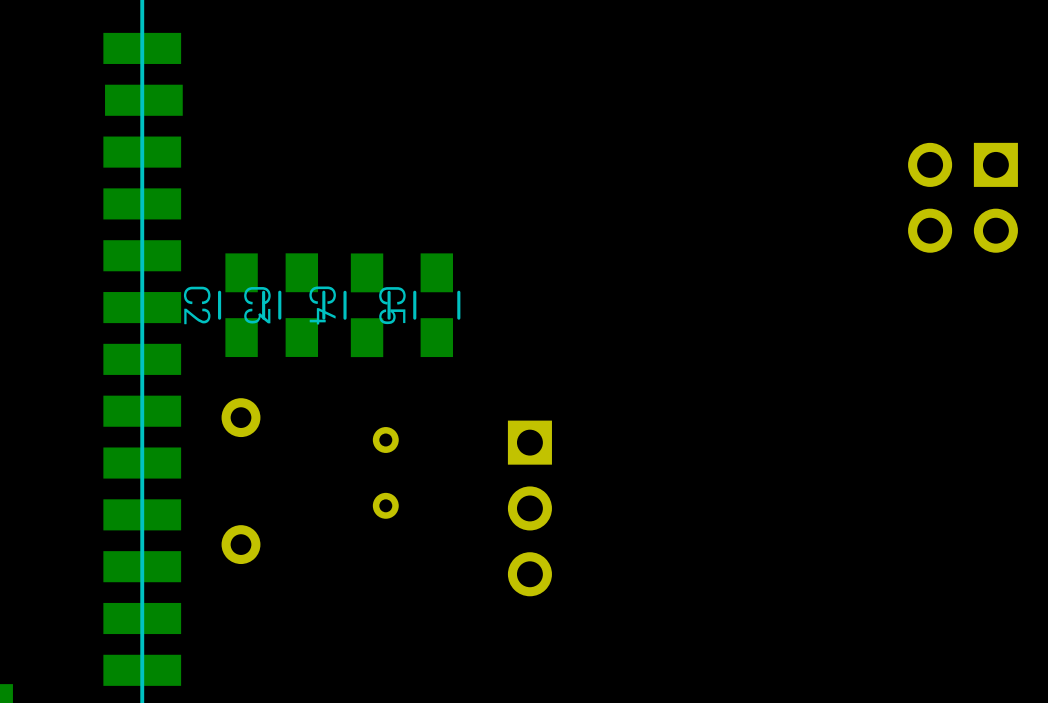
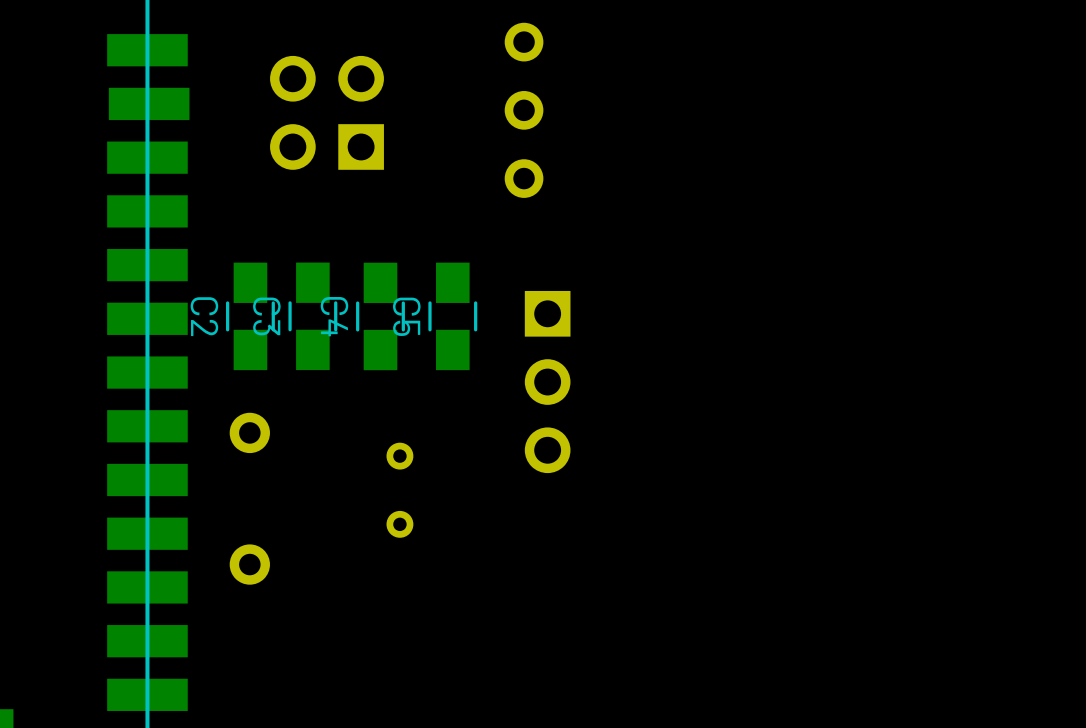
part: none -> (524, 110)
part: none -> (327, 112)
part: (963, 197) -> none
part position: (529, 508) -> (547, 382)

